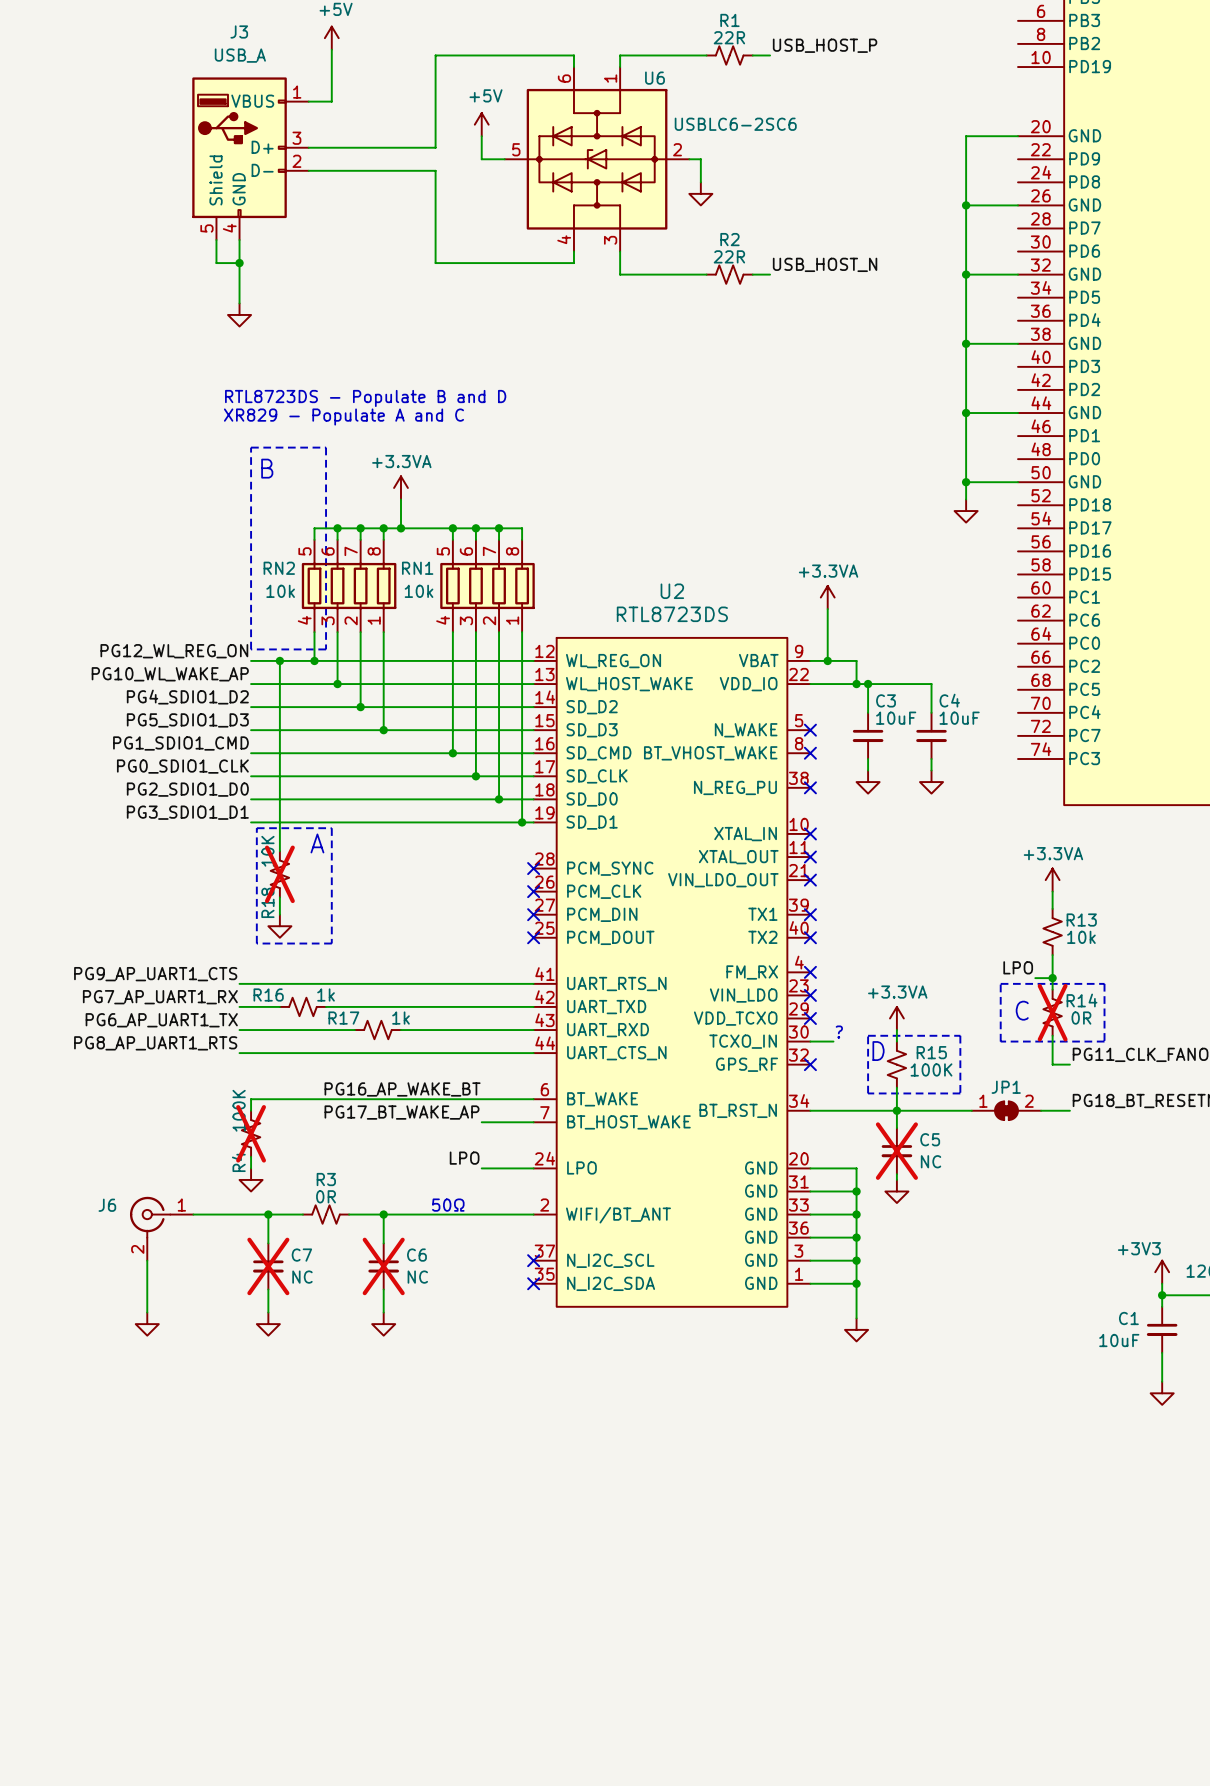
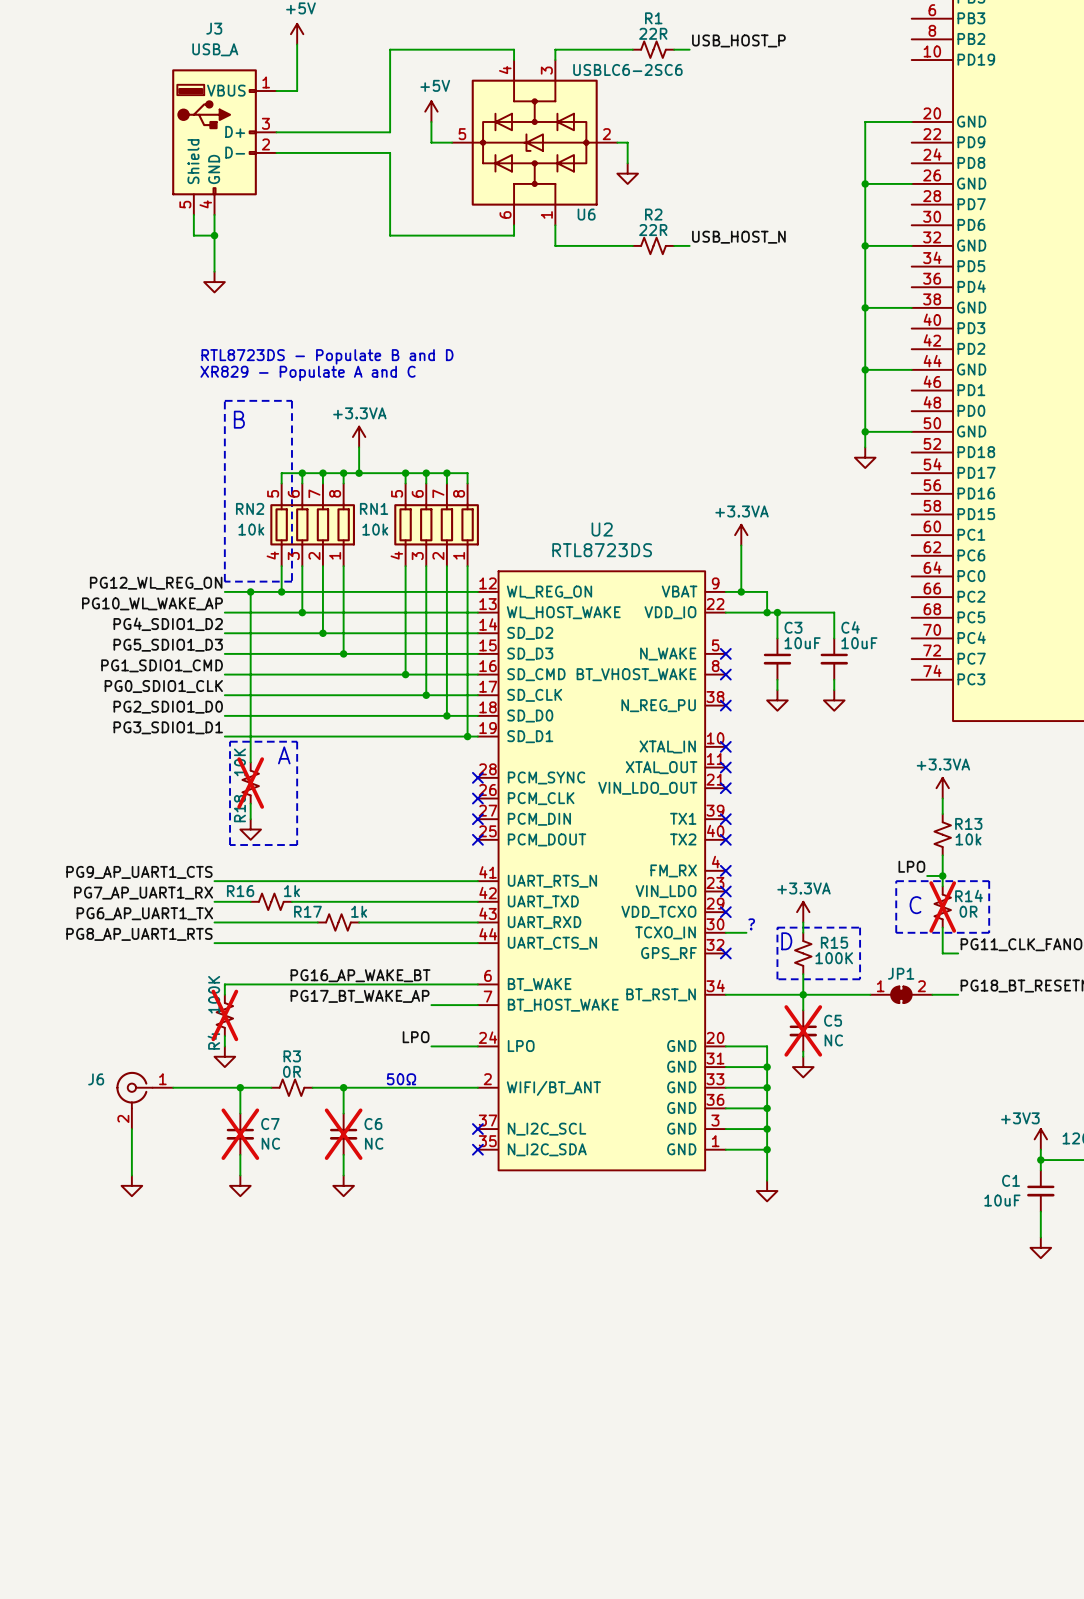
U6 value position: USBLC6-2SC6 (735, 124) -> USBLC6-2SC6 (627, 69)
U6 flip: as is (597, 159) -> up-down (534, 142)

